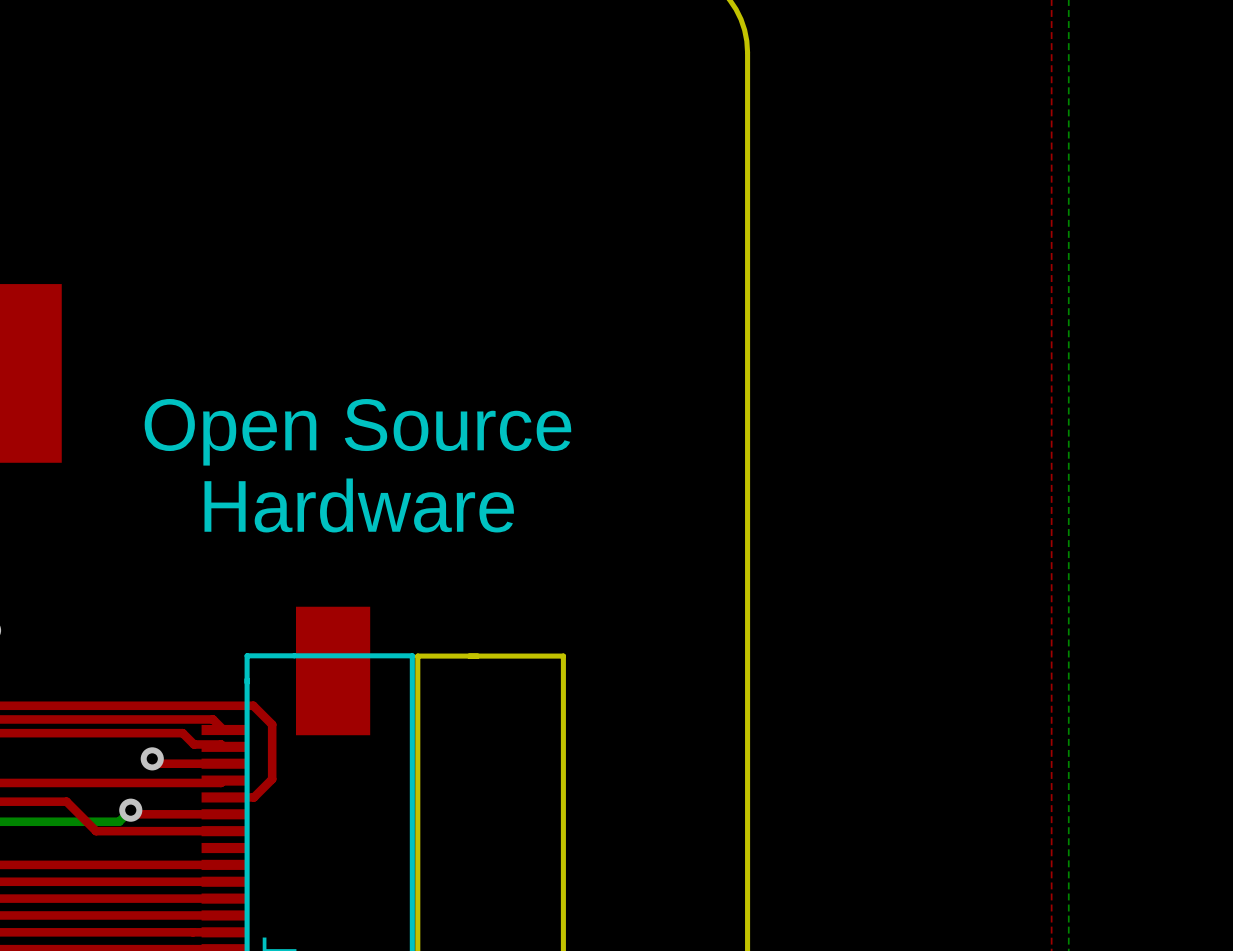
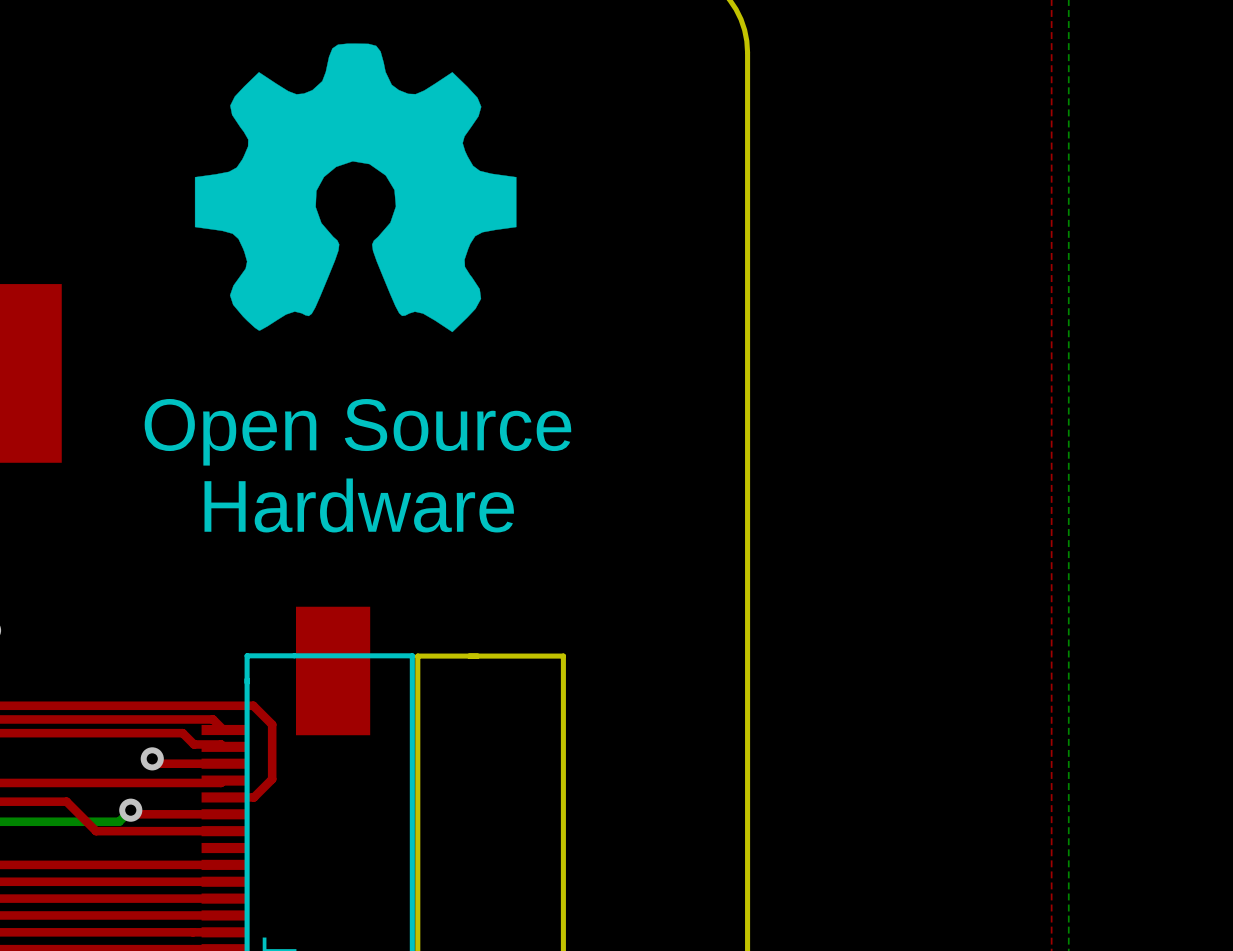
drawing: none -> [194, 43, 517, 333]

